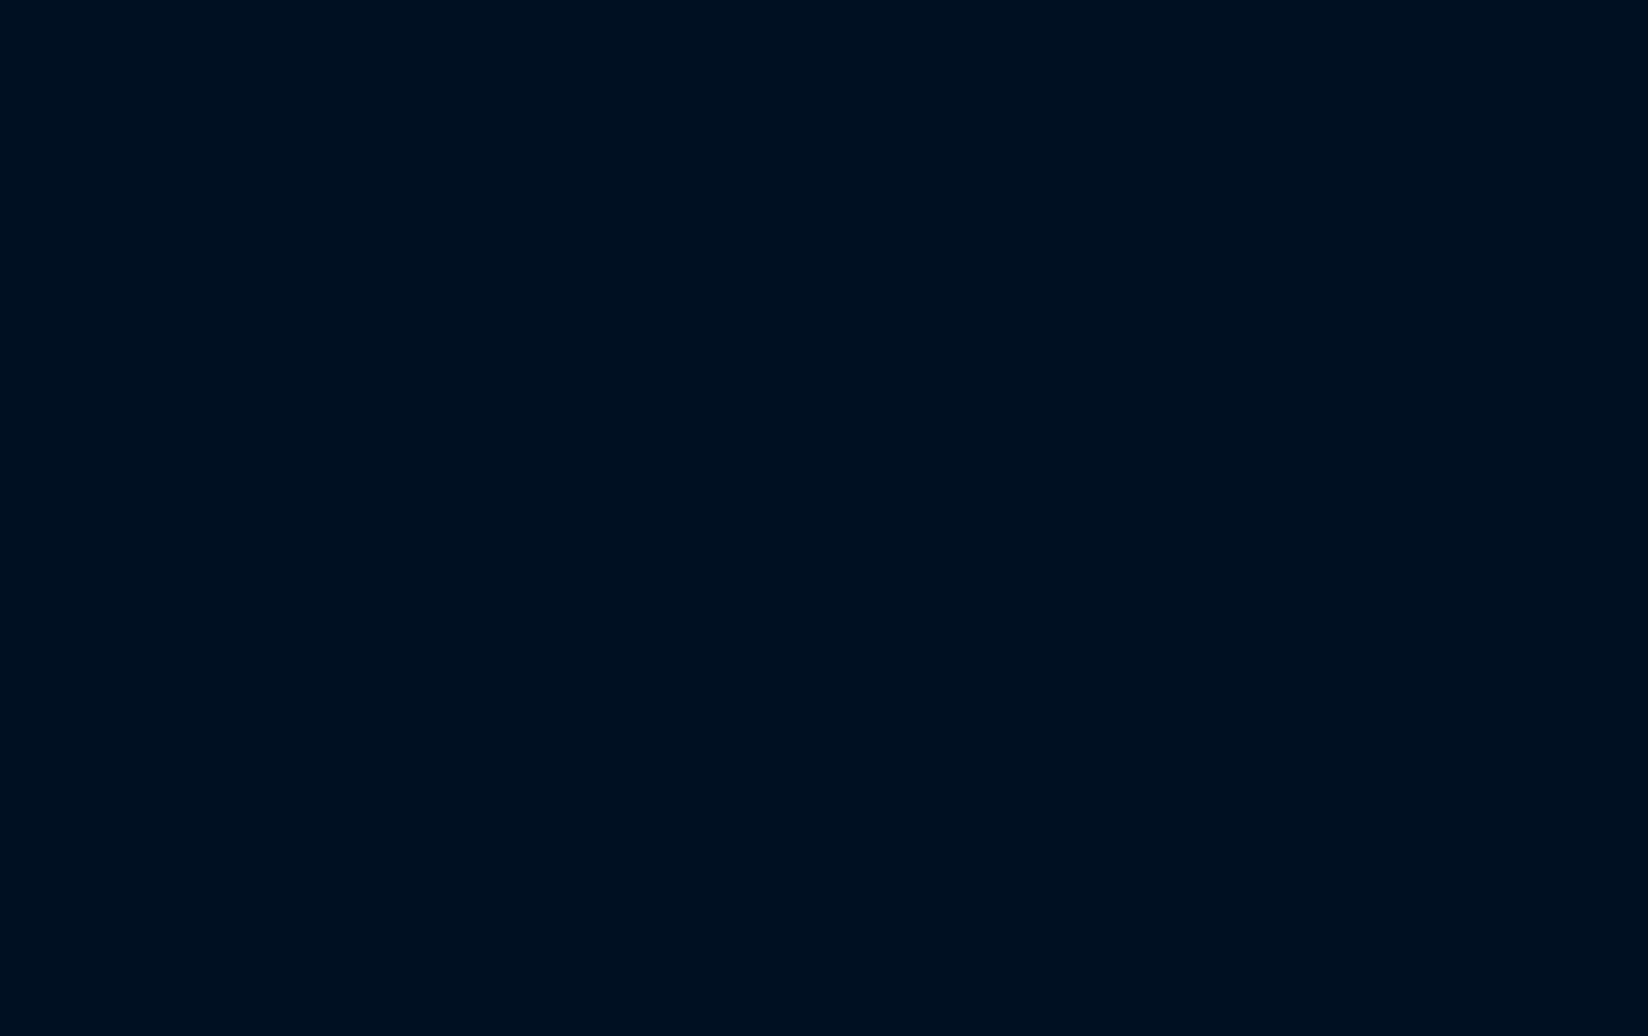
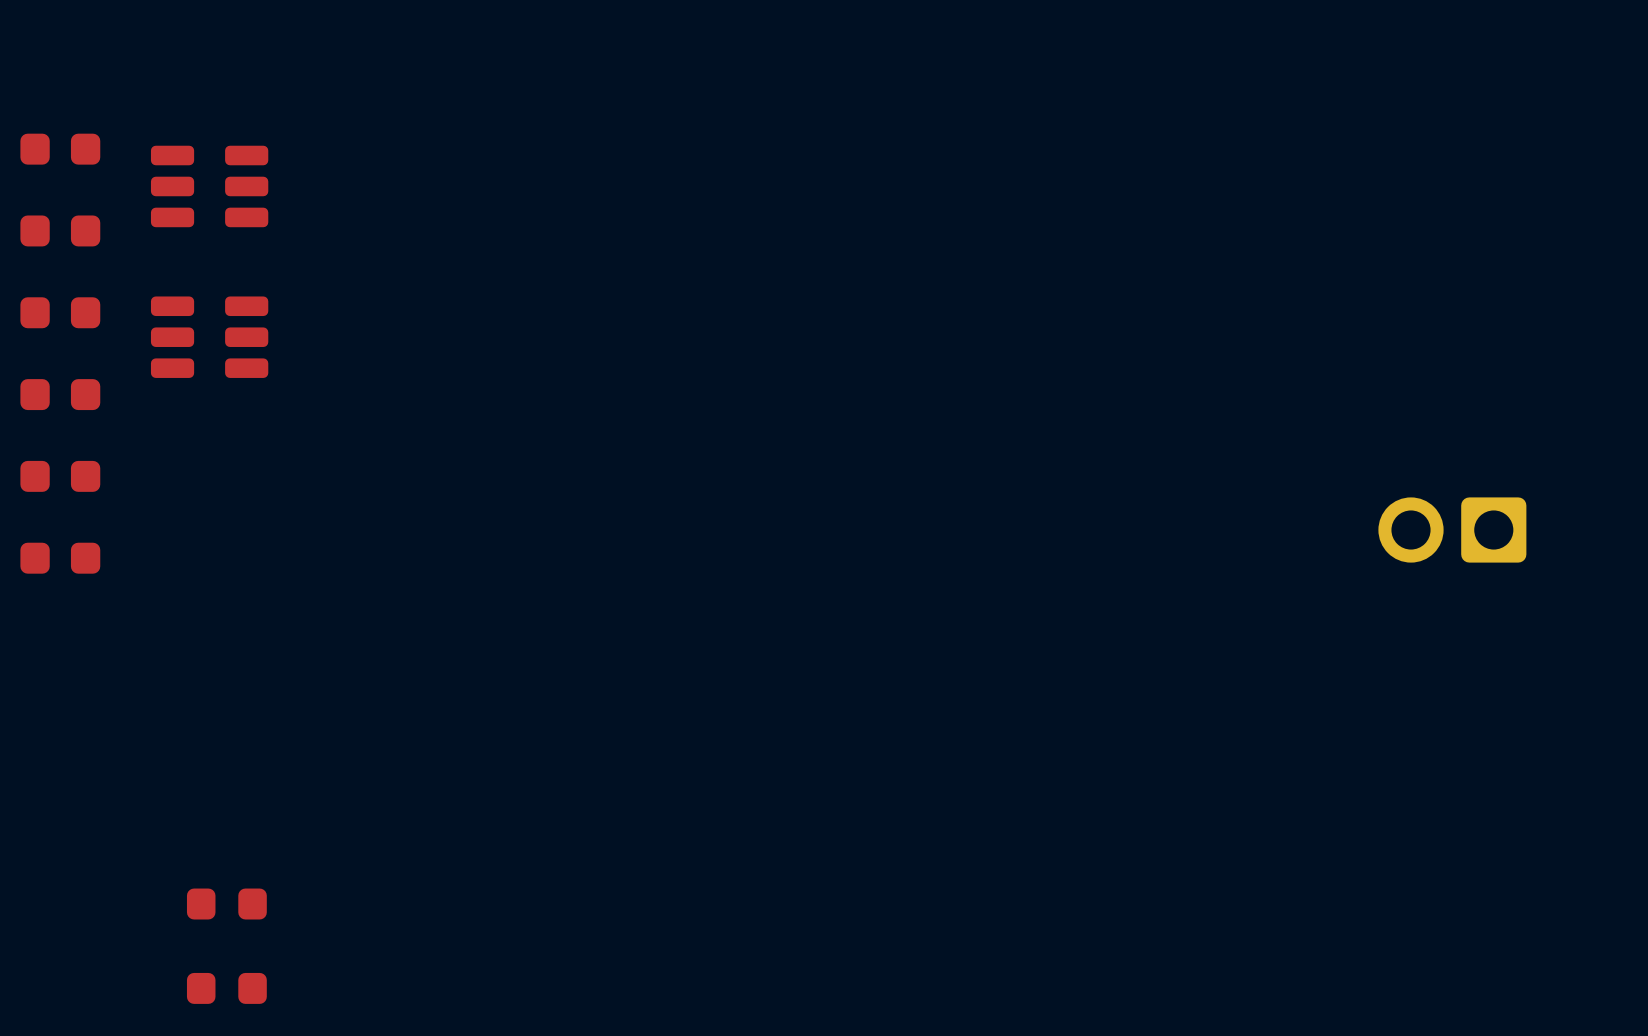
part: none -> (60, 149)
part: none -> (209, 186)
part: none -> (60, 230)
part: none -> (60, 312)
part: none -> (209, 337)
part: none -> (60, 394)
part: none -> (60, 476)
part: none -> (1452, 530)
part: none -> (60, 558)
part: none -> (226, 904)
part: none -> (226, 988)

